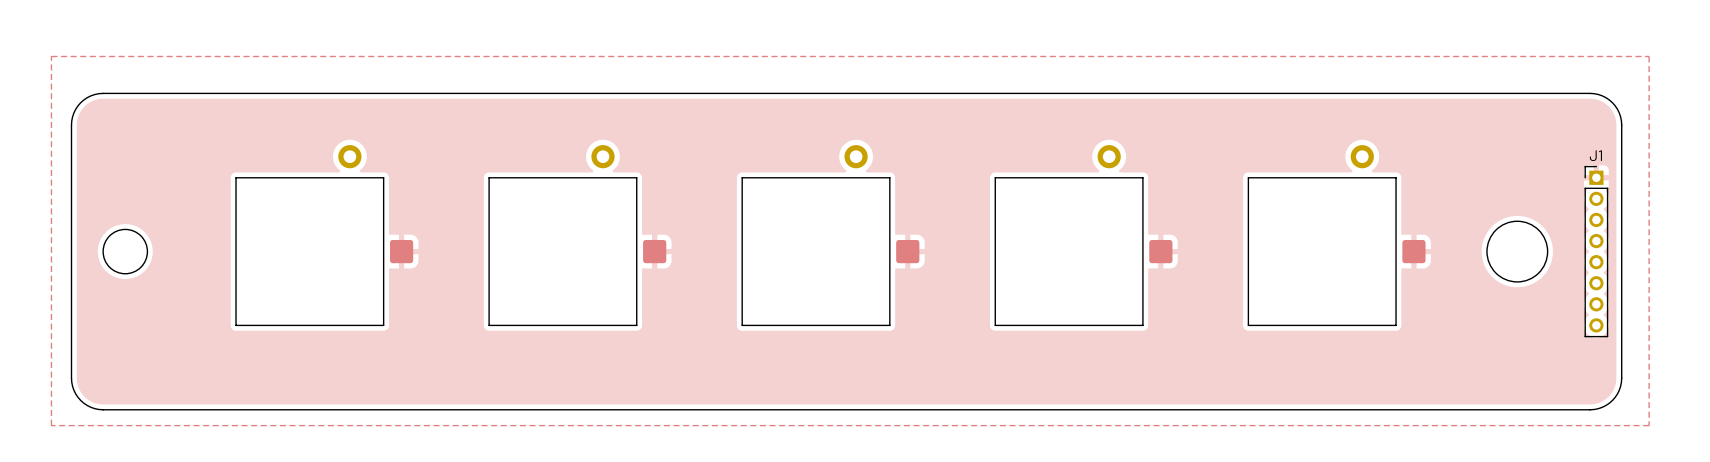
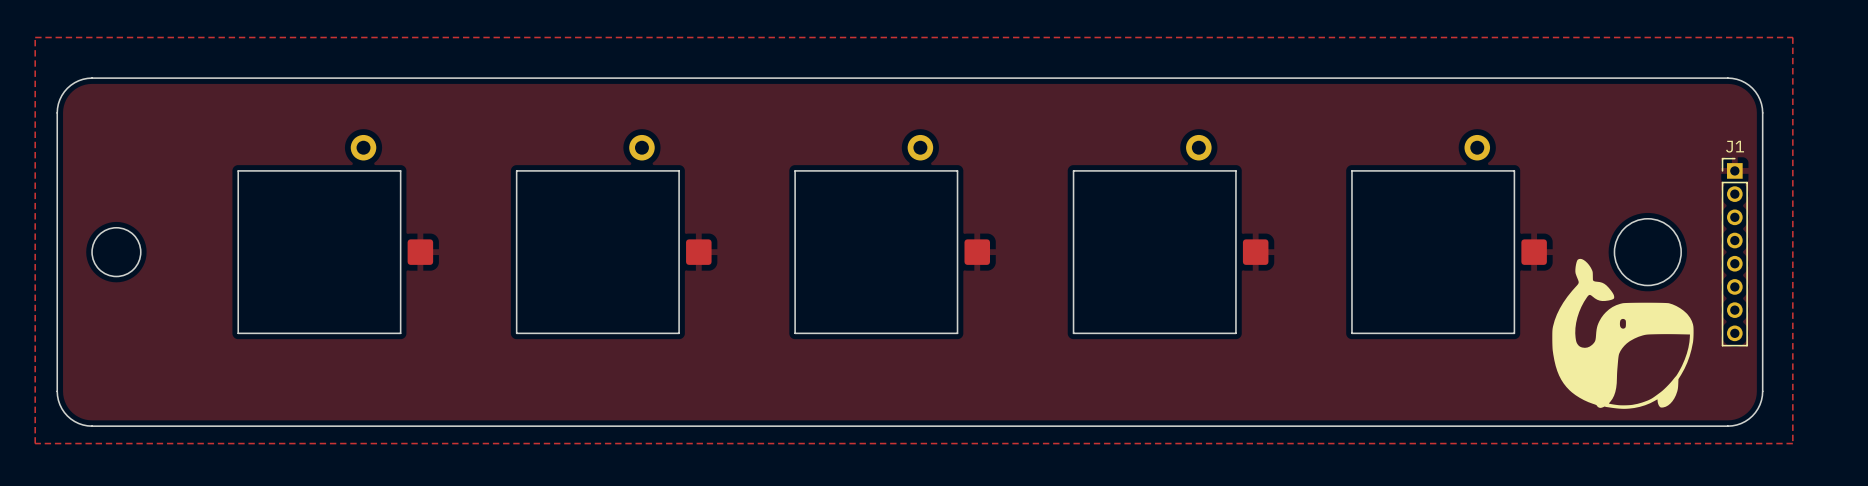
drawing: none -> [1552, 258, 1694, 409]

